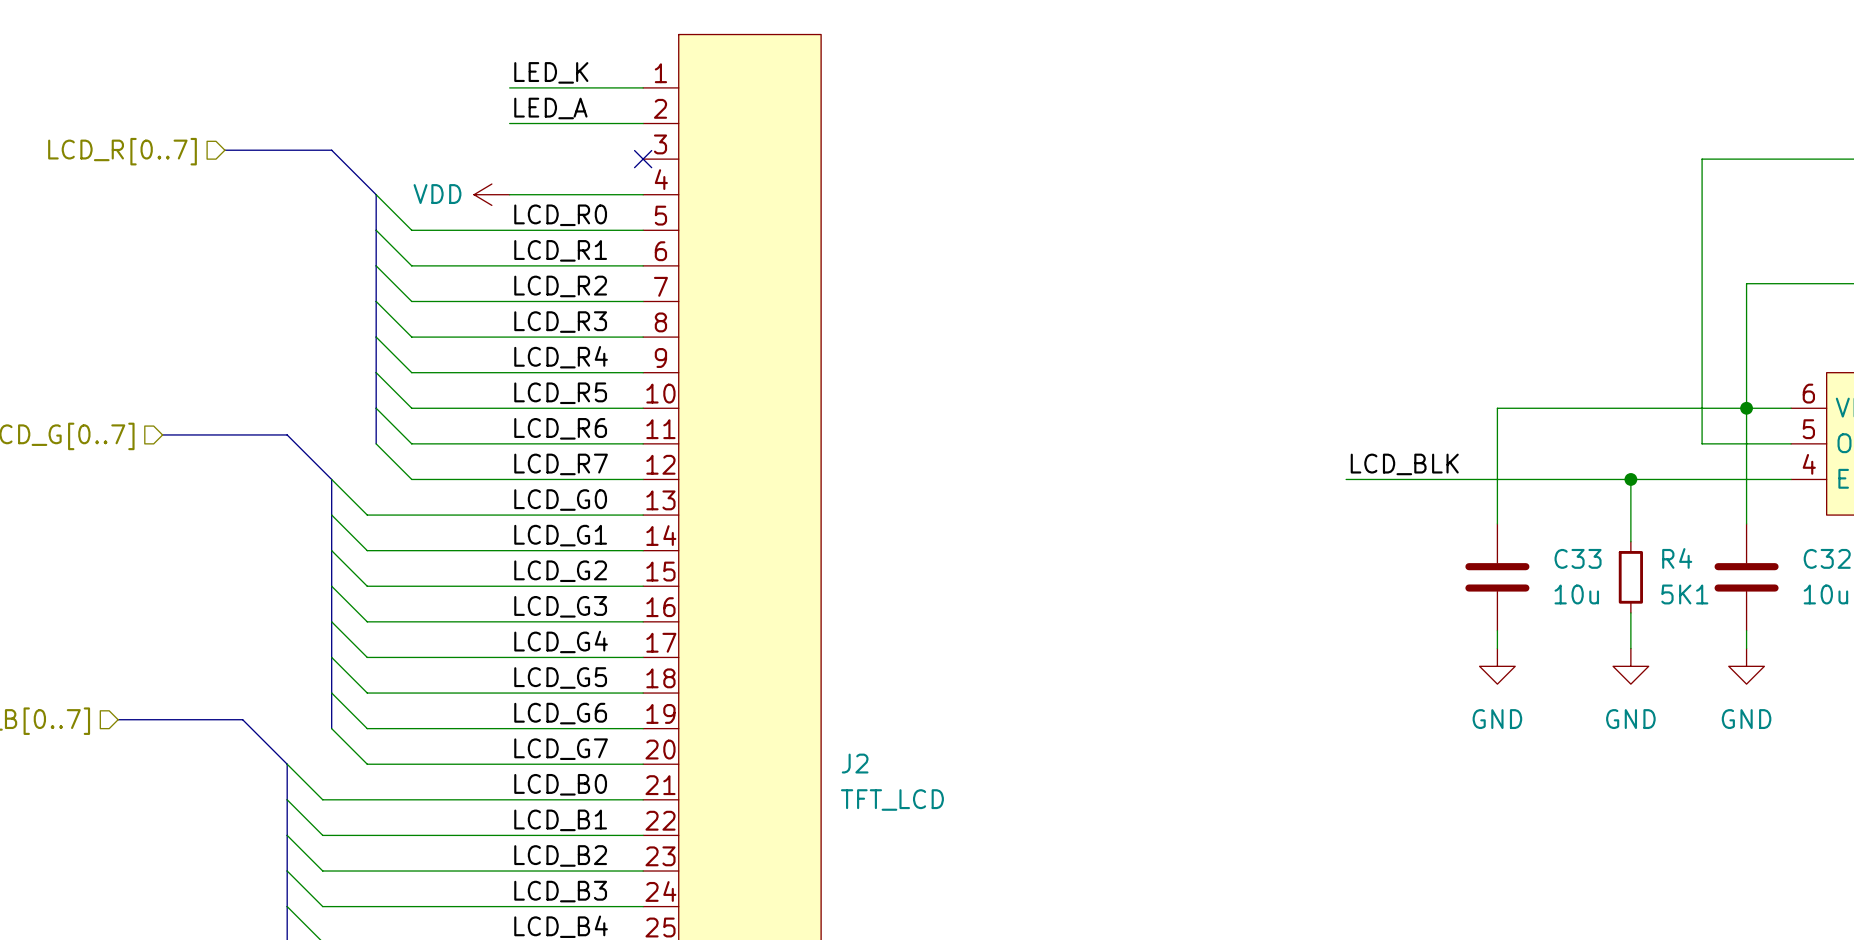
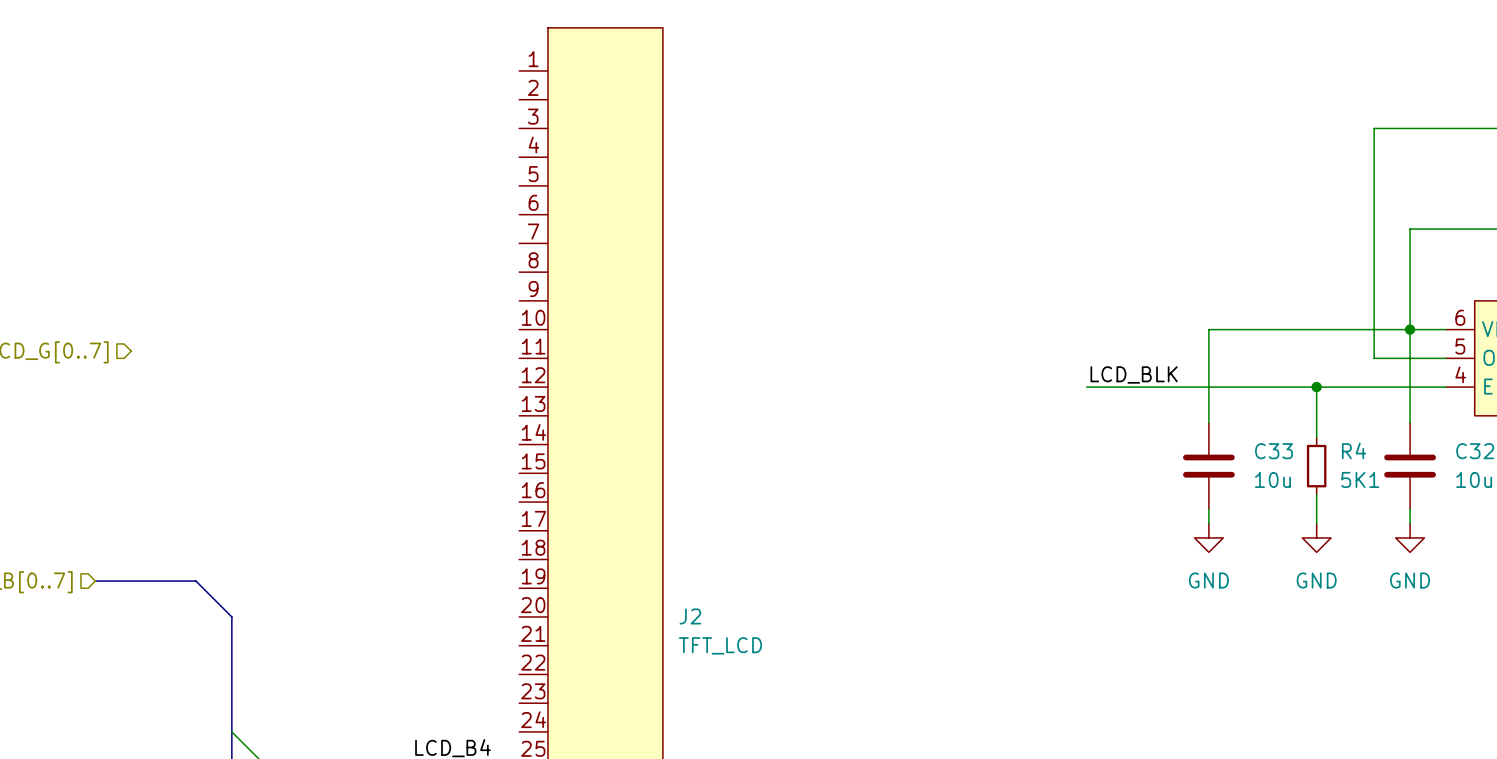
label: LED_K (551, 72) -> none
wire: (509, 87) (643, 87) -> none
label: LED_A (550, 108) -> none
wire: (509, 123) (643, 123) -> none
bus: (224, 150) (331, 150) (376, 194) (376, 443) -> none
hierarchical label: LCD_R[0..7] (122, 151) -> none
no-connect mark: (643, 159) -> none
wire: (376, 194) (411, 230) (643, 230) -> none
power symbol: VDD (491, 194) -> none
wire: (509, 194) (643, 194) -> none
label: LCD_R0 (560, 215) -> none
wire: (376, 230) (411, 265) (643, 265) -> none
label: LCD_R1 (560, 250) -> none
wire: (376, 265) (411, 301) (643, 301) -> none
label: LCD_R2 (560, 286) -> none
wire: (376, 301) (411, 337) (643, 337) -> none
label: LCD_R3 (560, 322) -> none
wire: (376, 337) (411, 372) (643, 372) -> none
label: LCD_R4 (561, 357) -> none
wire: (376, 372) (411, 408) (643, 408) -> none
label: LCD_R5 (560, 393) -> none
wire: (376, 408) (411, 443) (643, 443) -> none
label: LCD_R6 (560, 428) -> none
bus: (162, 434) (287, 434) (331, 479) (331, 728) -> none
wire: (376, 443) (411, 479) (643, 479) -> none
label: LCD_R7 (561, 464) -> none
wire: (331, 479) (367, 515) (643, 515) -> none
label: LCD_G0 (560, 500) -> none
wire: (331, 515) (367, 550) (643, 550) -> none
label: LCD_G1 (560, 535) -> none
wire: (331, 550) (367, 586) (643, 586) -> none
label: LCD_G2 (560, 571) -> none
wire: (331, 586) (367, 621) (643, 621) -> none
label: LCD_G3 (560, 606) -> none
wire: (331, 621) (367, 657) (643, 657) -> none
label: LCD_G4 (561, 641) -> none
wire: (331, 657) (367, 693) (643, 693) -> none
label: LCD_G5 (560, 677) -> none
wire: (331, 693) (367, 728) (643, 728) -> none
label: LCD_G6 (560, 713) -> none
wire: (331, 728) (367, 764) (643, 764) -> none
label: LCD_G7 (561, 749) -> none
wire: (287, 764) (322, 799) (643, 799) -> none
label: LCD_B0 (560, 784) -> none
wire: (287, 799) (322, 835) (643, 835) -> none
label: LCD_B1 (560, 820) -> none
wire: (287, 835) (322, 871) (643, 871) -> none
label: LCD_B2 (560, 855) -> none
wire: (287, 871) (322, 906) (643, 906) -> none
label: LCD_B3 (560, 891) -> none

